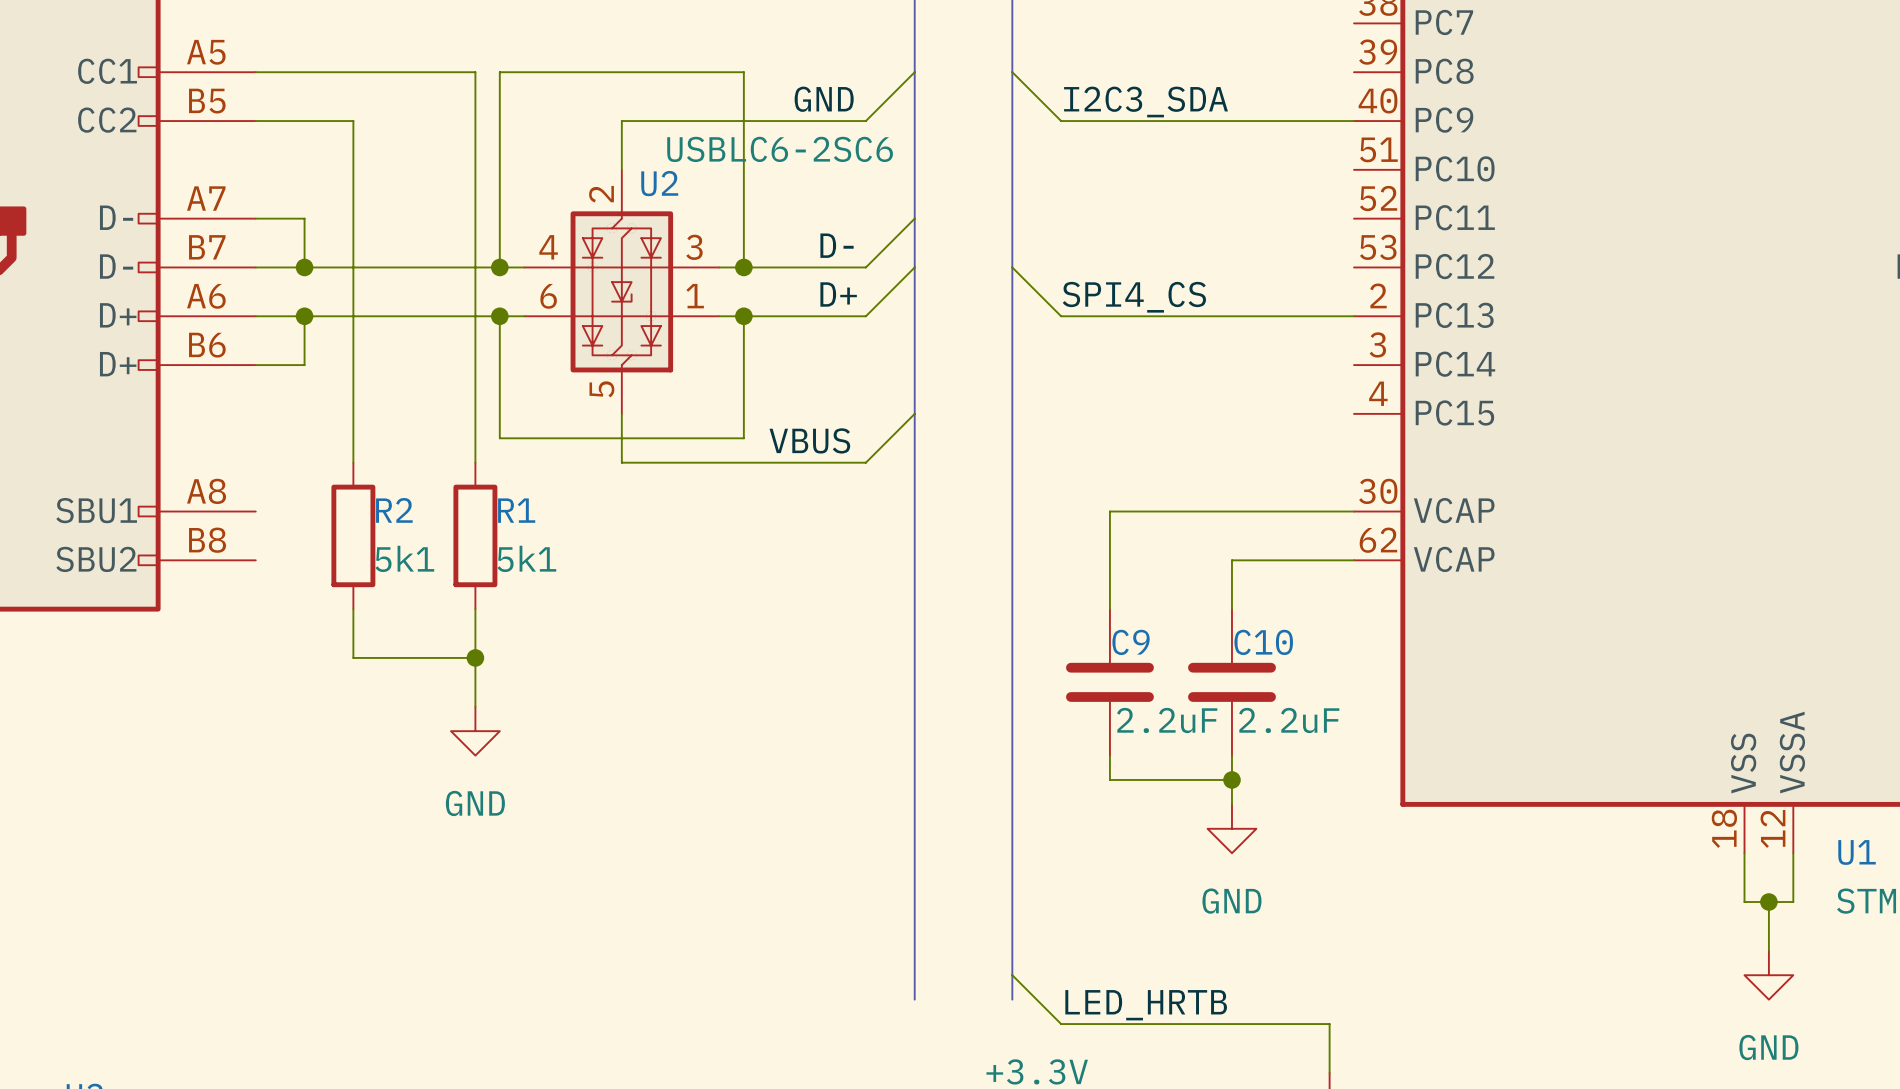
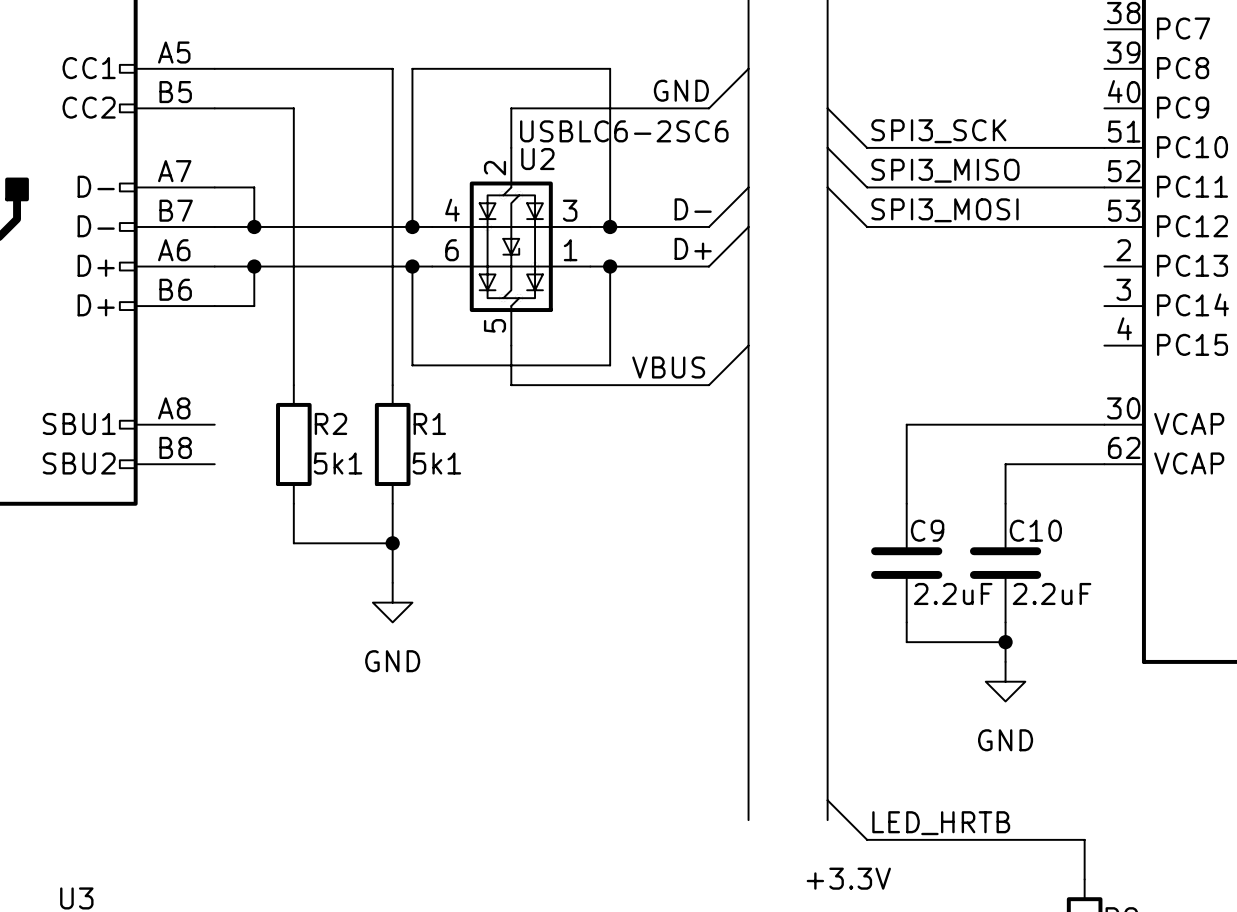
wire: (1012, 72) (1061, 121) (1354, 121) -> (827, 108) (867, 147) (1104, 147)
label: I2C3_SDA (1146, 101) -> none
label: none -> SPI3_SCK (938, 131)
wire: none -> (827, 147) (867, 187) (1104, 187)
label: none -> SPI3_MISO (945, 170)
wire: (1012, 267) (1061, 316) (1354, 316) -> (827, 187) (867, 226) (1104, 226)
label: SPI4_CS (1134, 297) -> SPI3_MOSI (944, 210)

